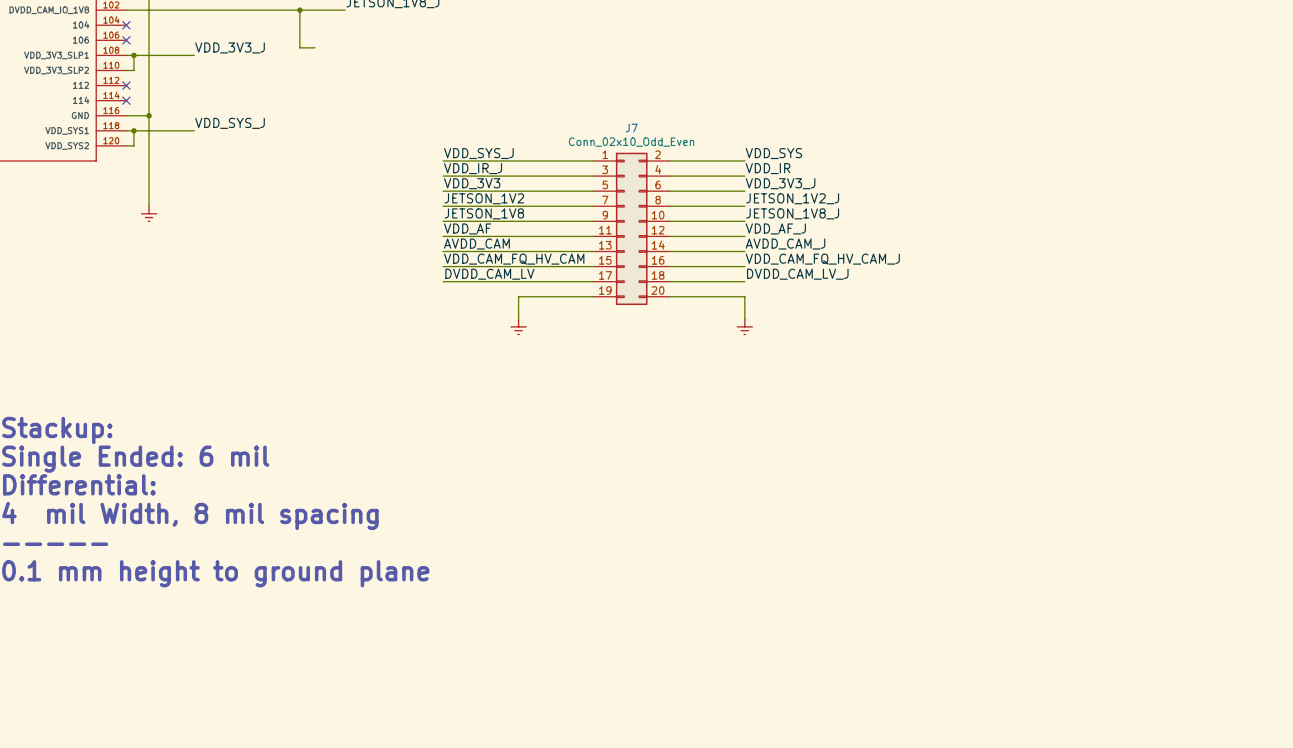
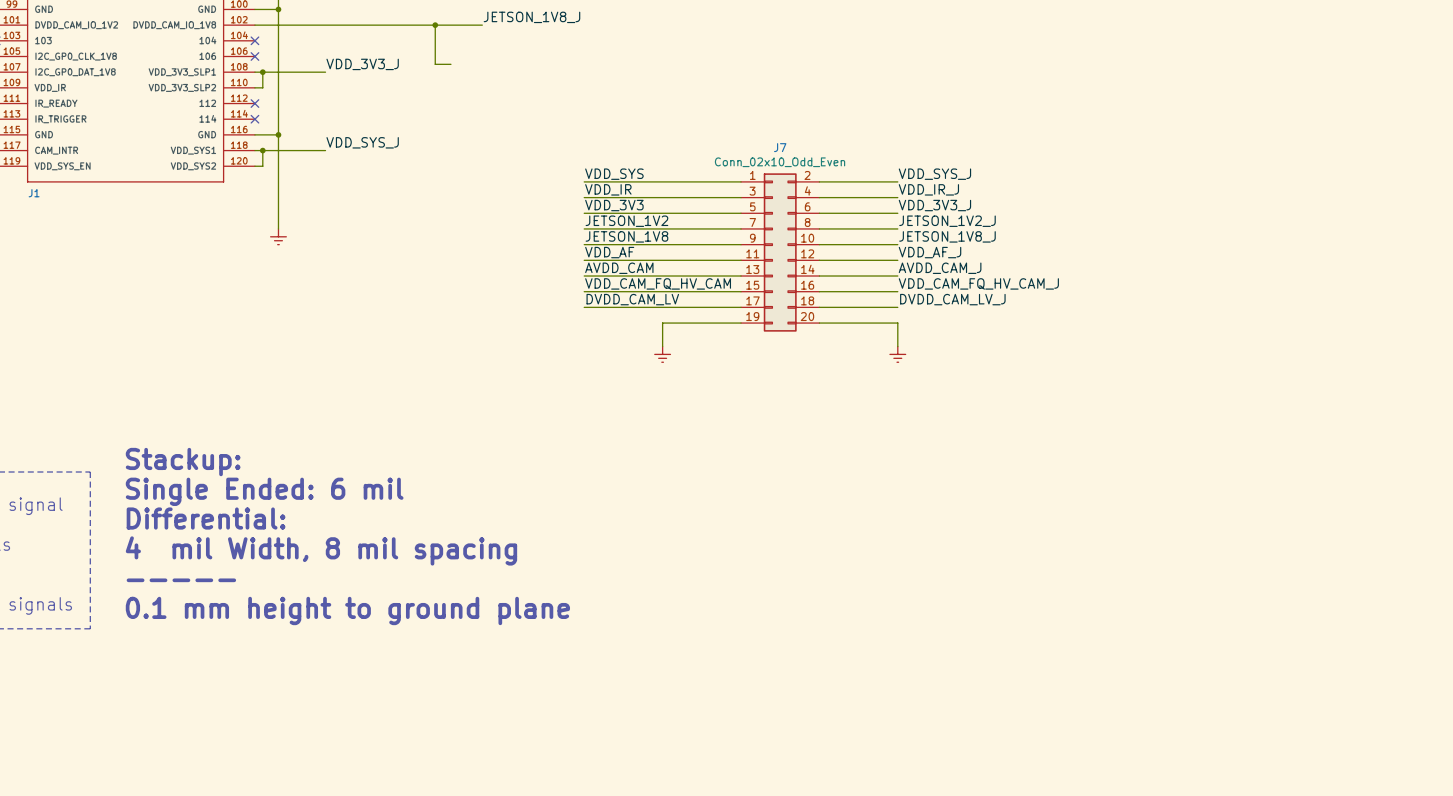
label: VDD_SYS_J (478, 153) -> VDD_SYS (614, 174)
label: VDD_SYS (773, 153) -> VDD_SYS_J (934, 174)
label: VDD_IR_J (473, 168) -> VDD_IR (608, 189)
label: VDD_IR (768, 168) -> VDD_IR_J (928, 189)

